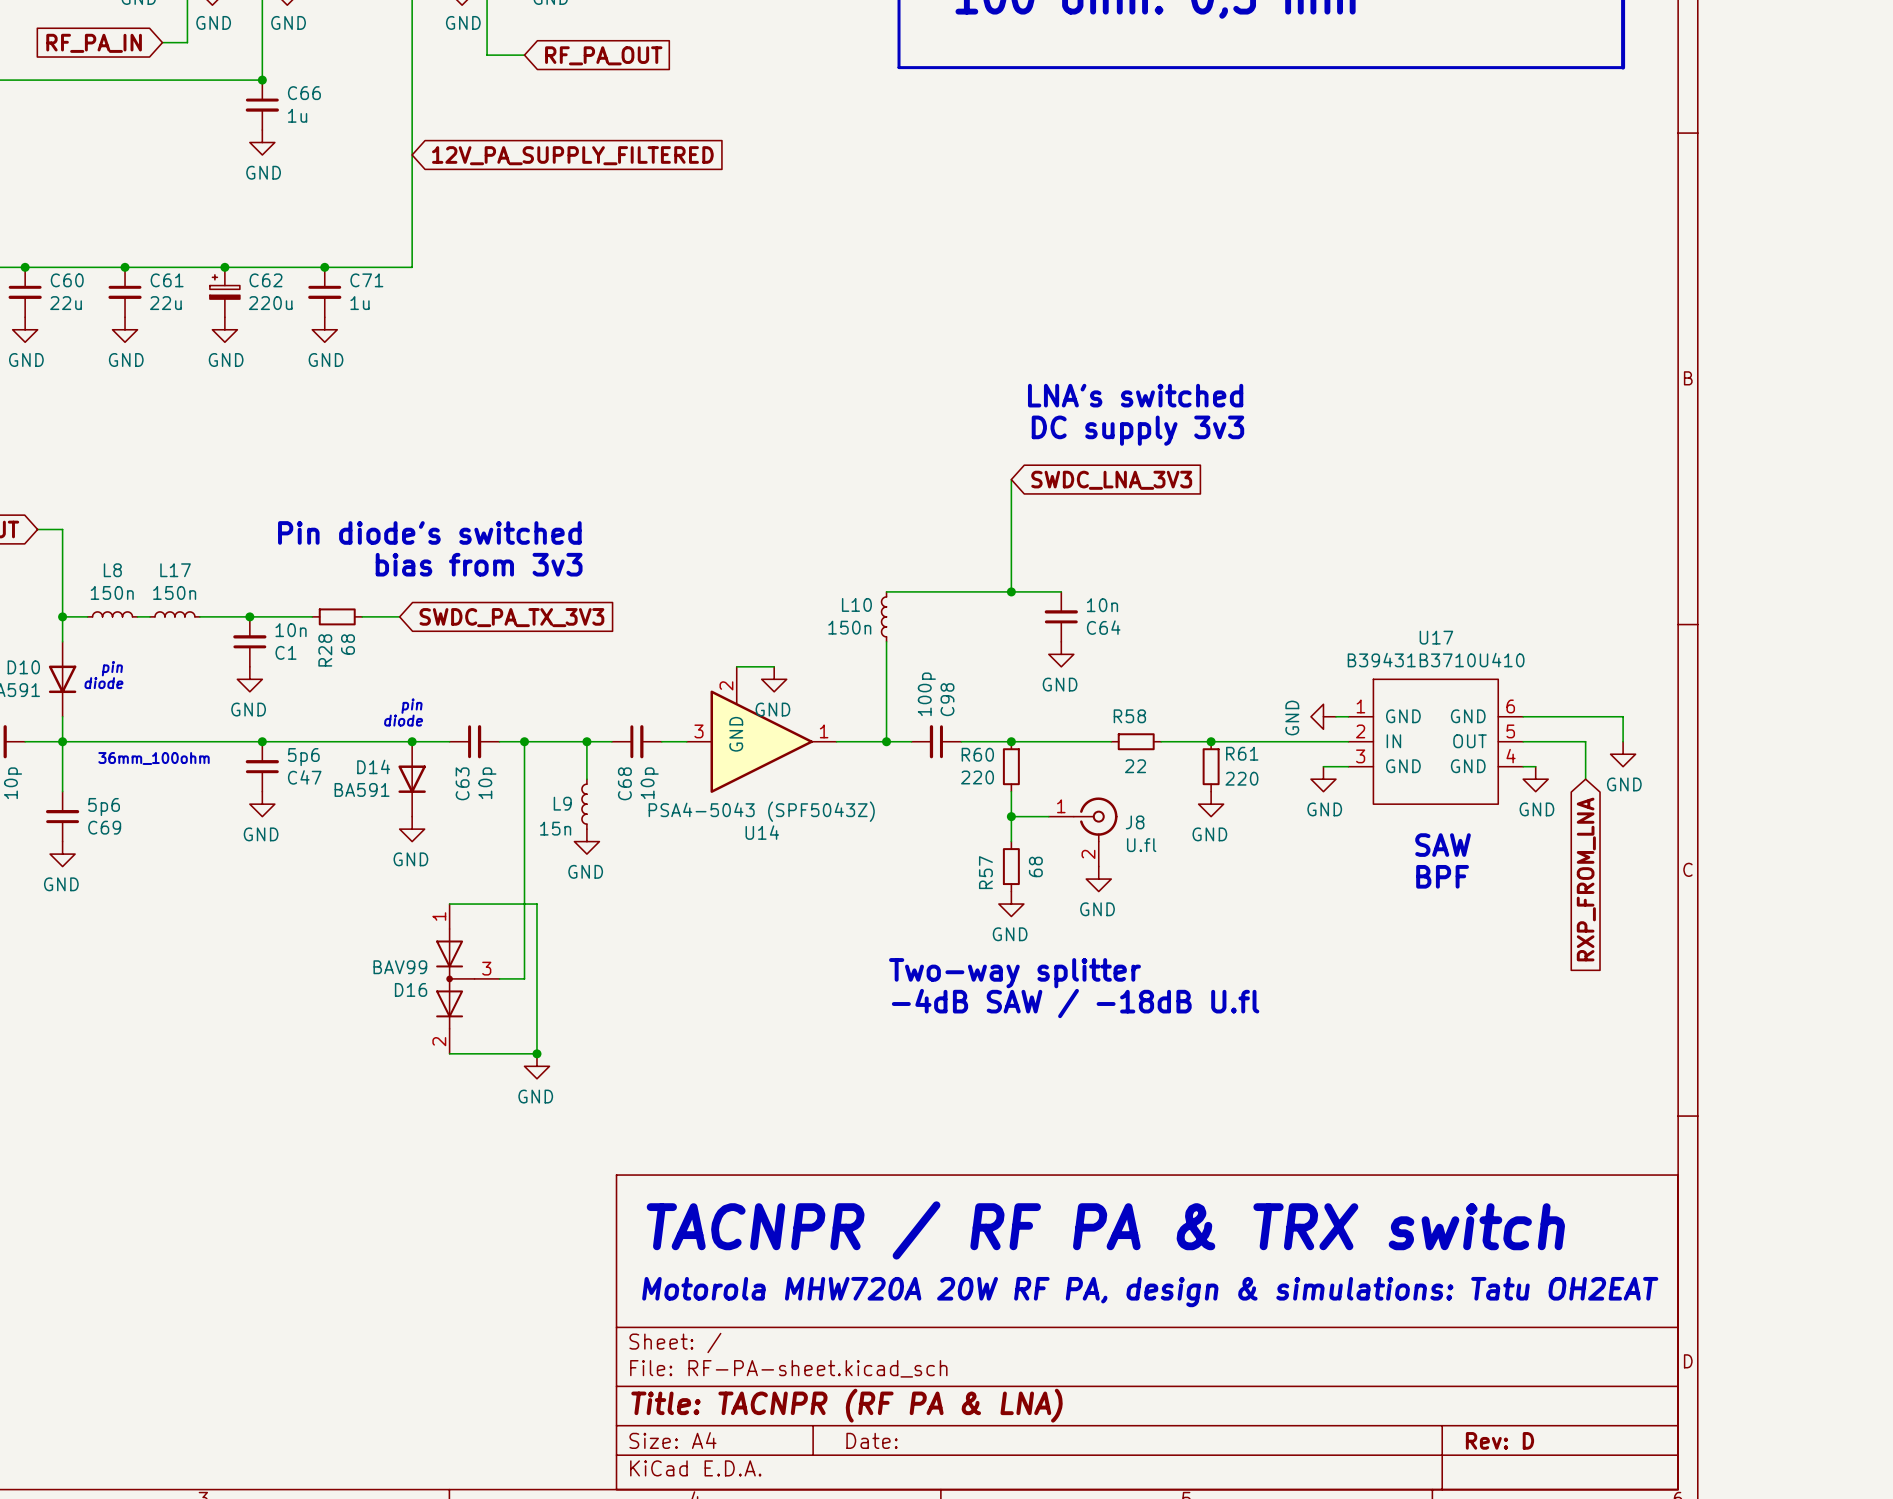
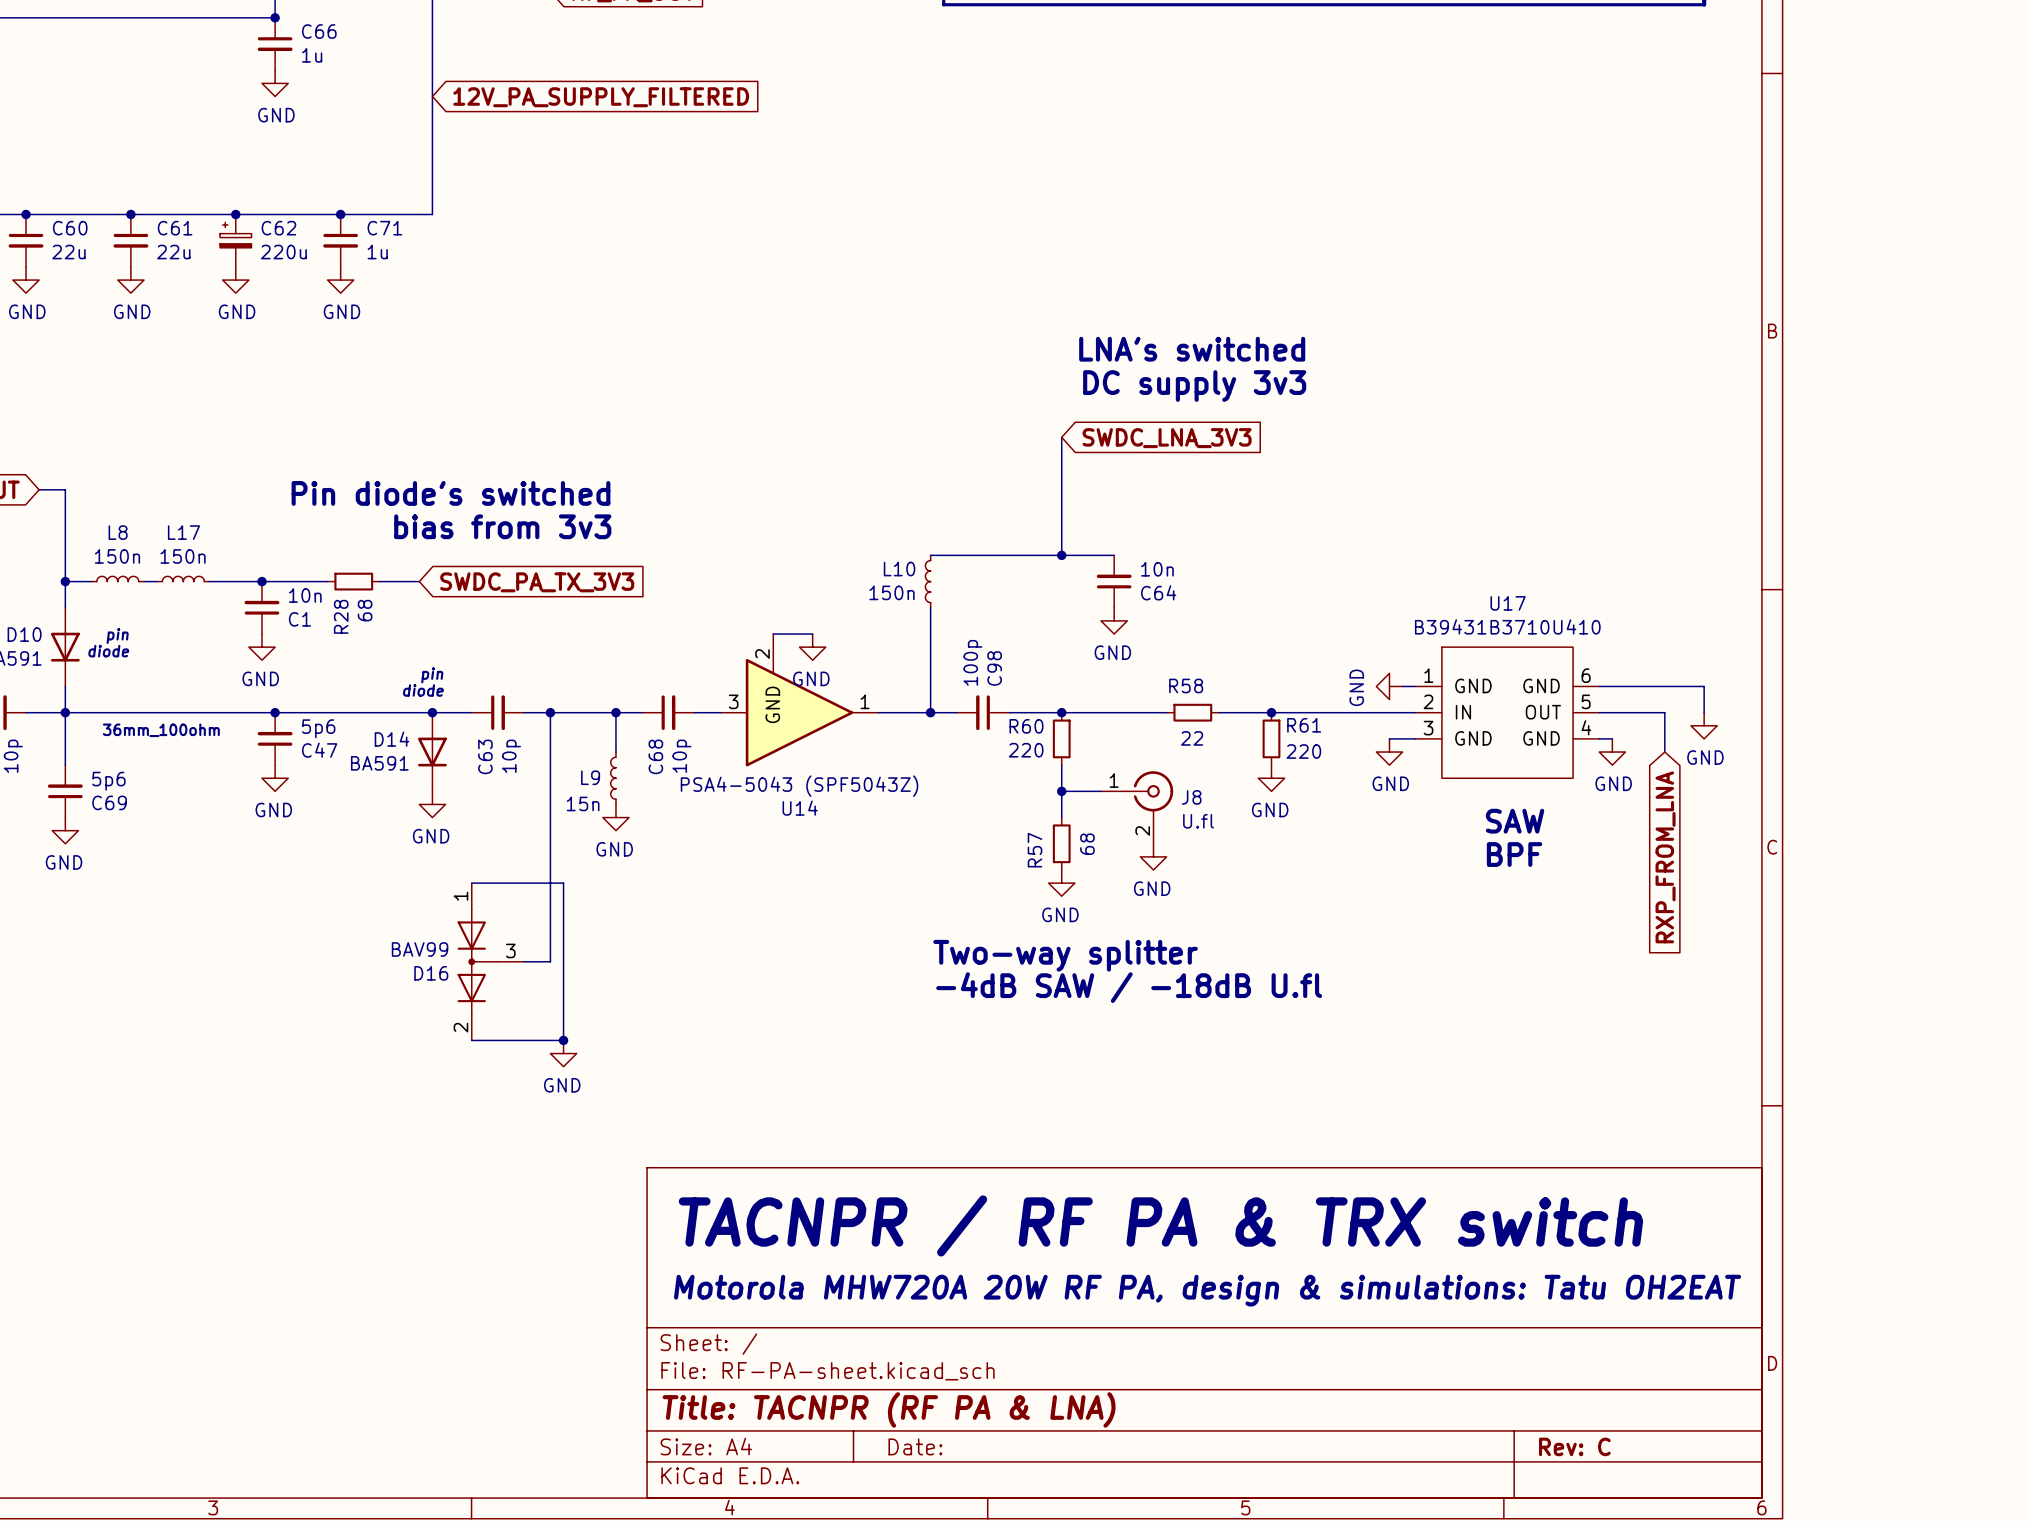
title block: Rev: D (1499, 1440) -> Rev: C (1574, 1446)

